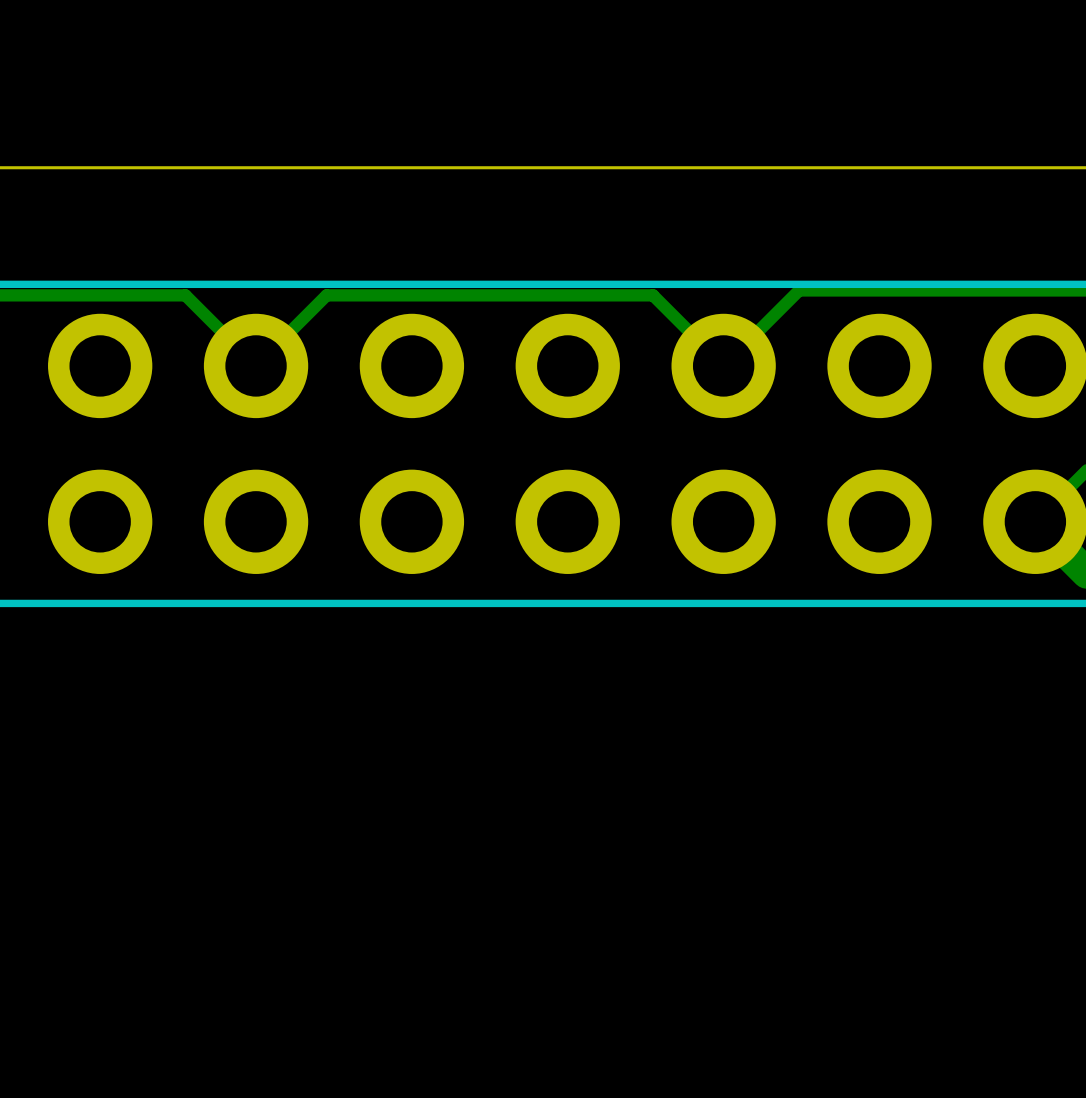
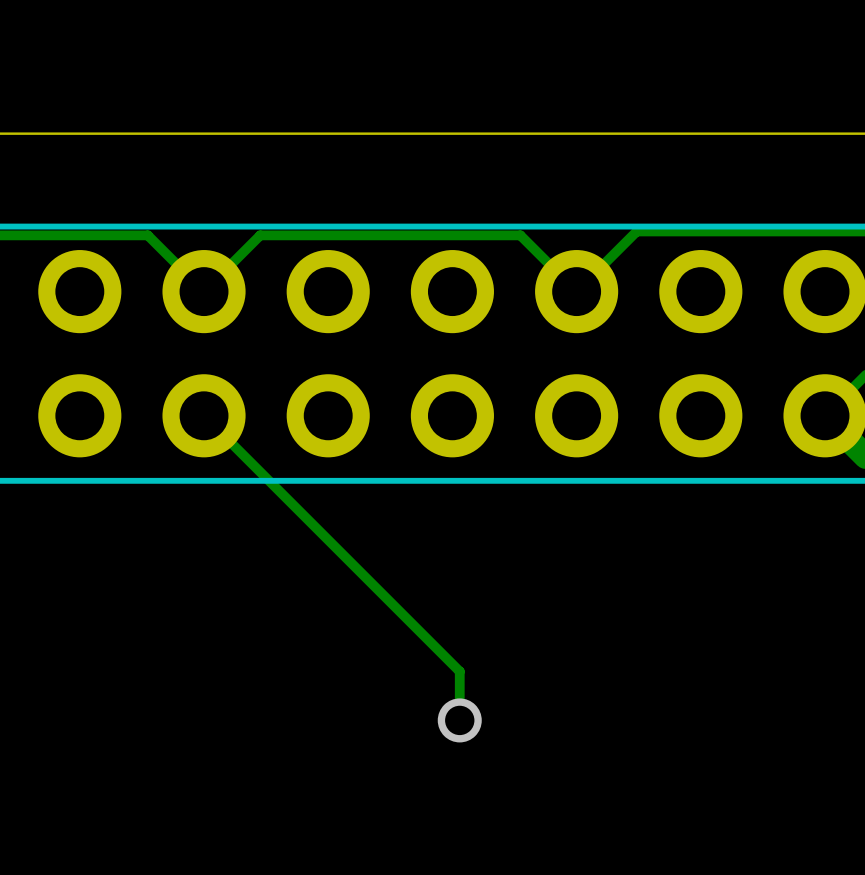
track: none -> (204, 415) (459, 671) (459, 720)
via: none -> (459, 720)

